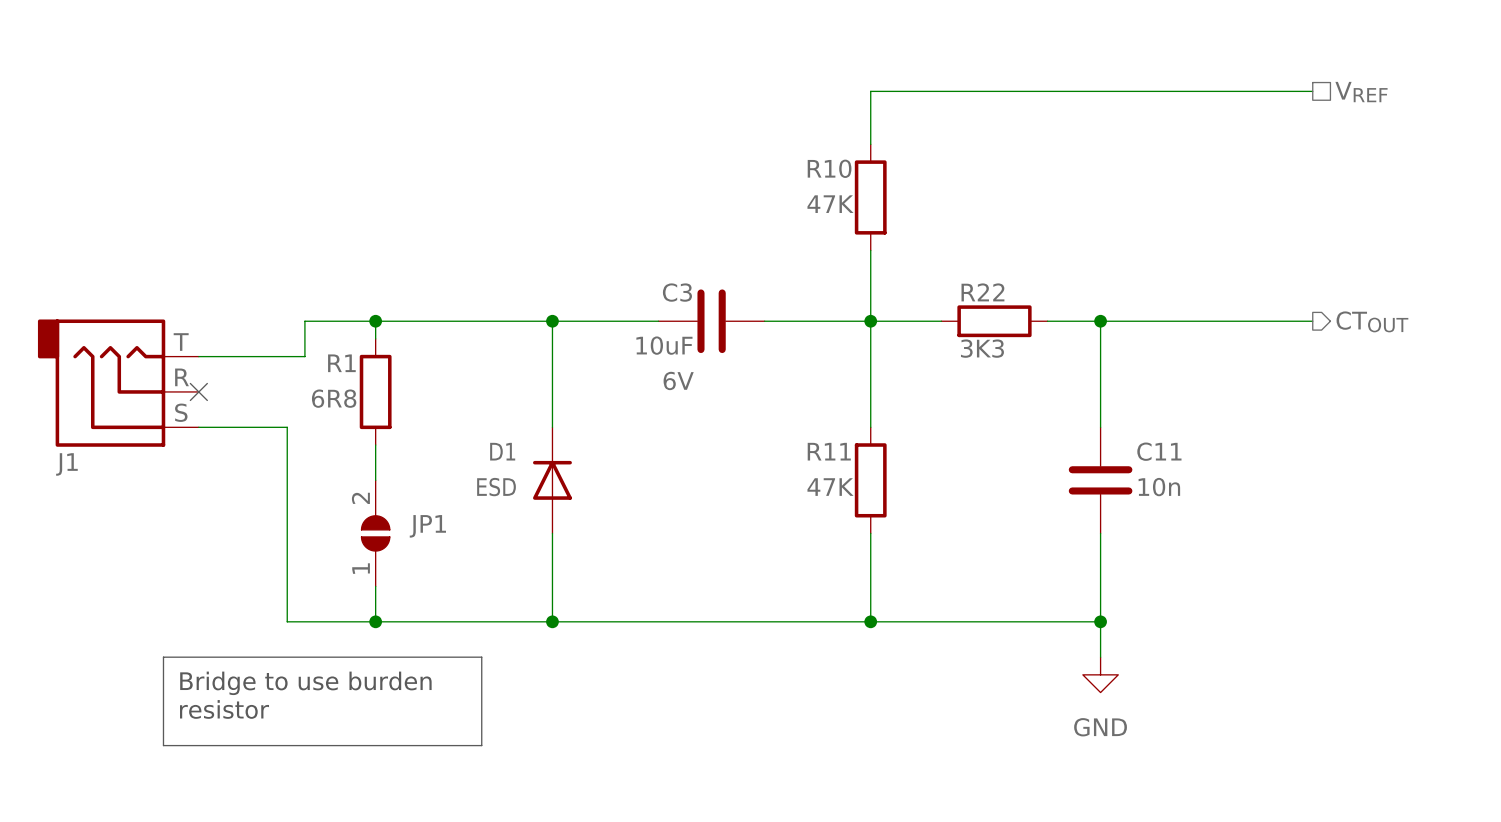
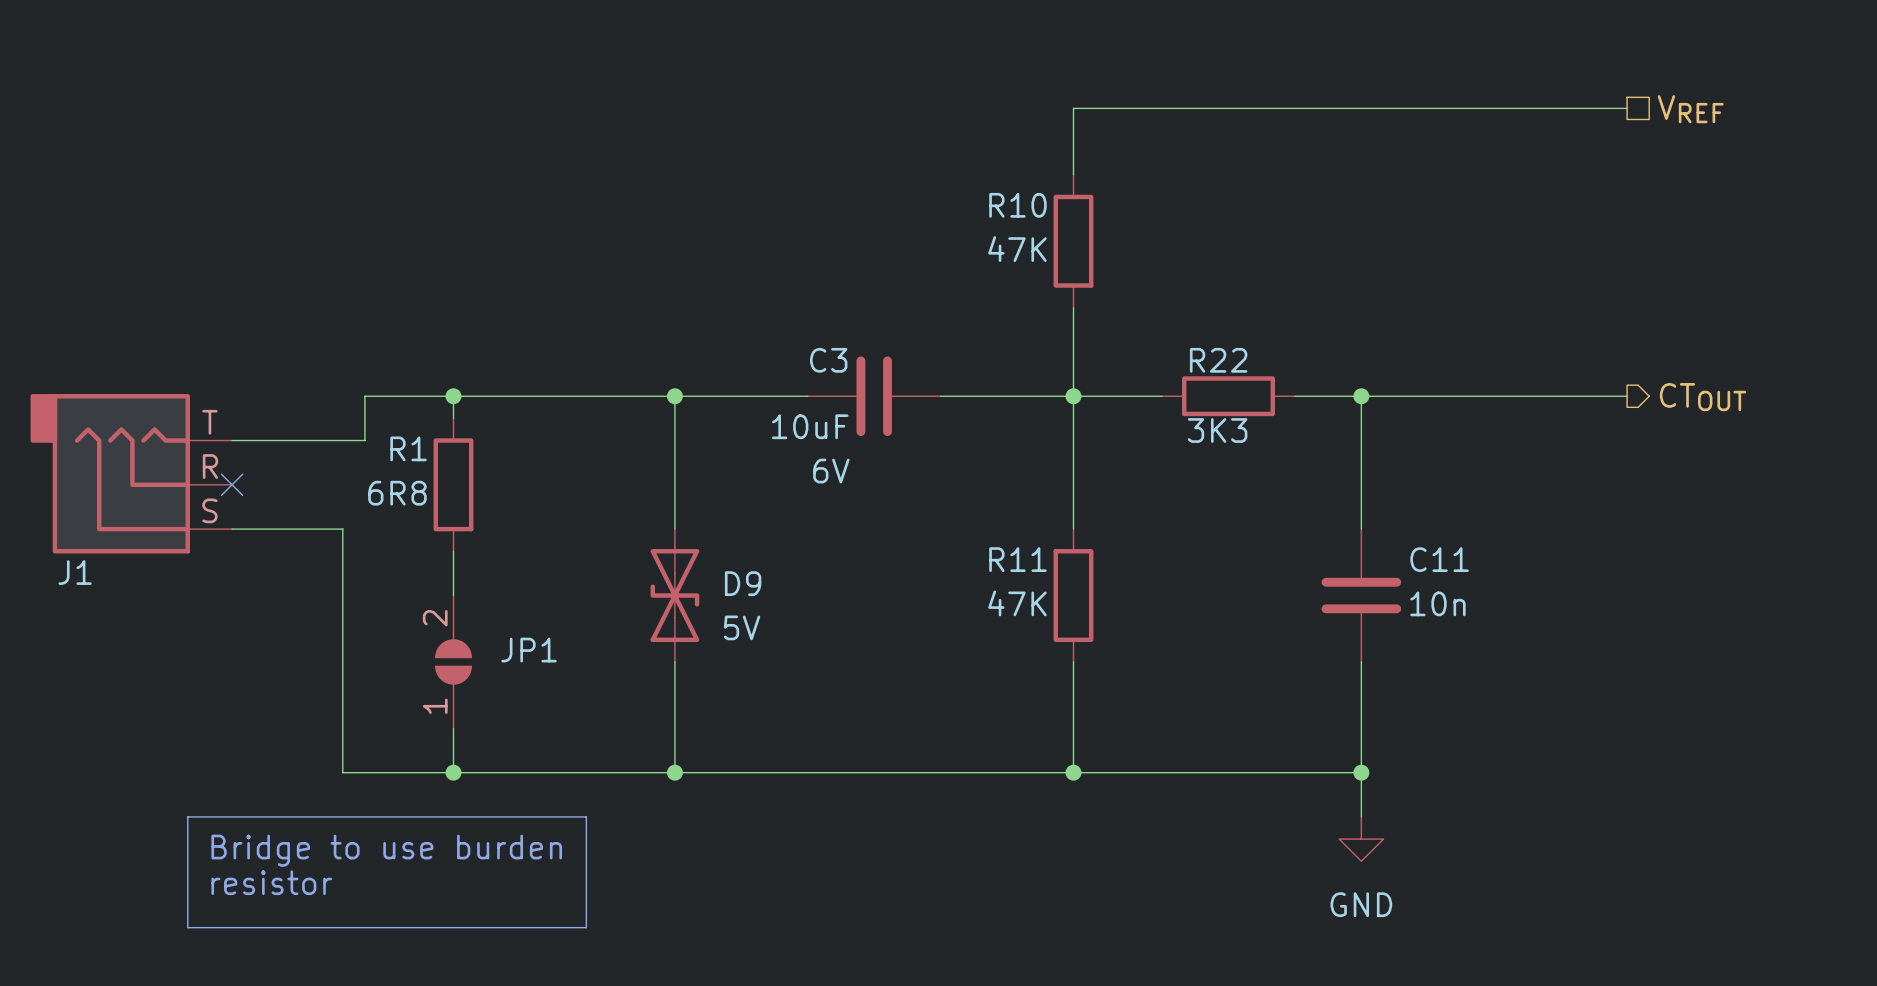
D1: ESD (552, 480) -> none
D9: none -> 5V (674, 595)

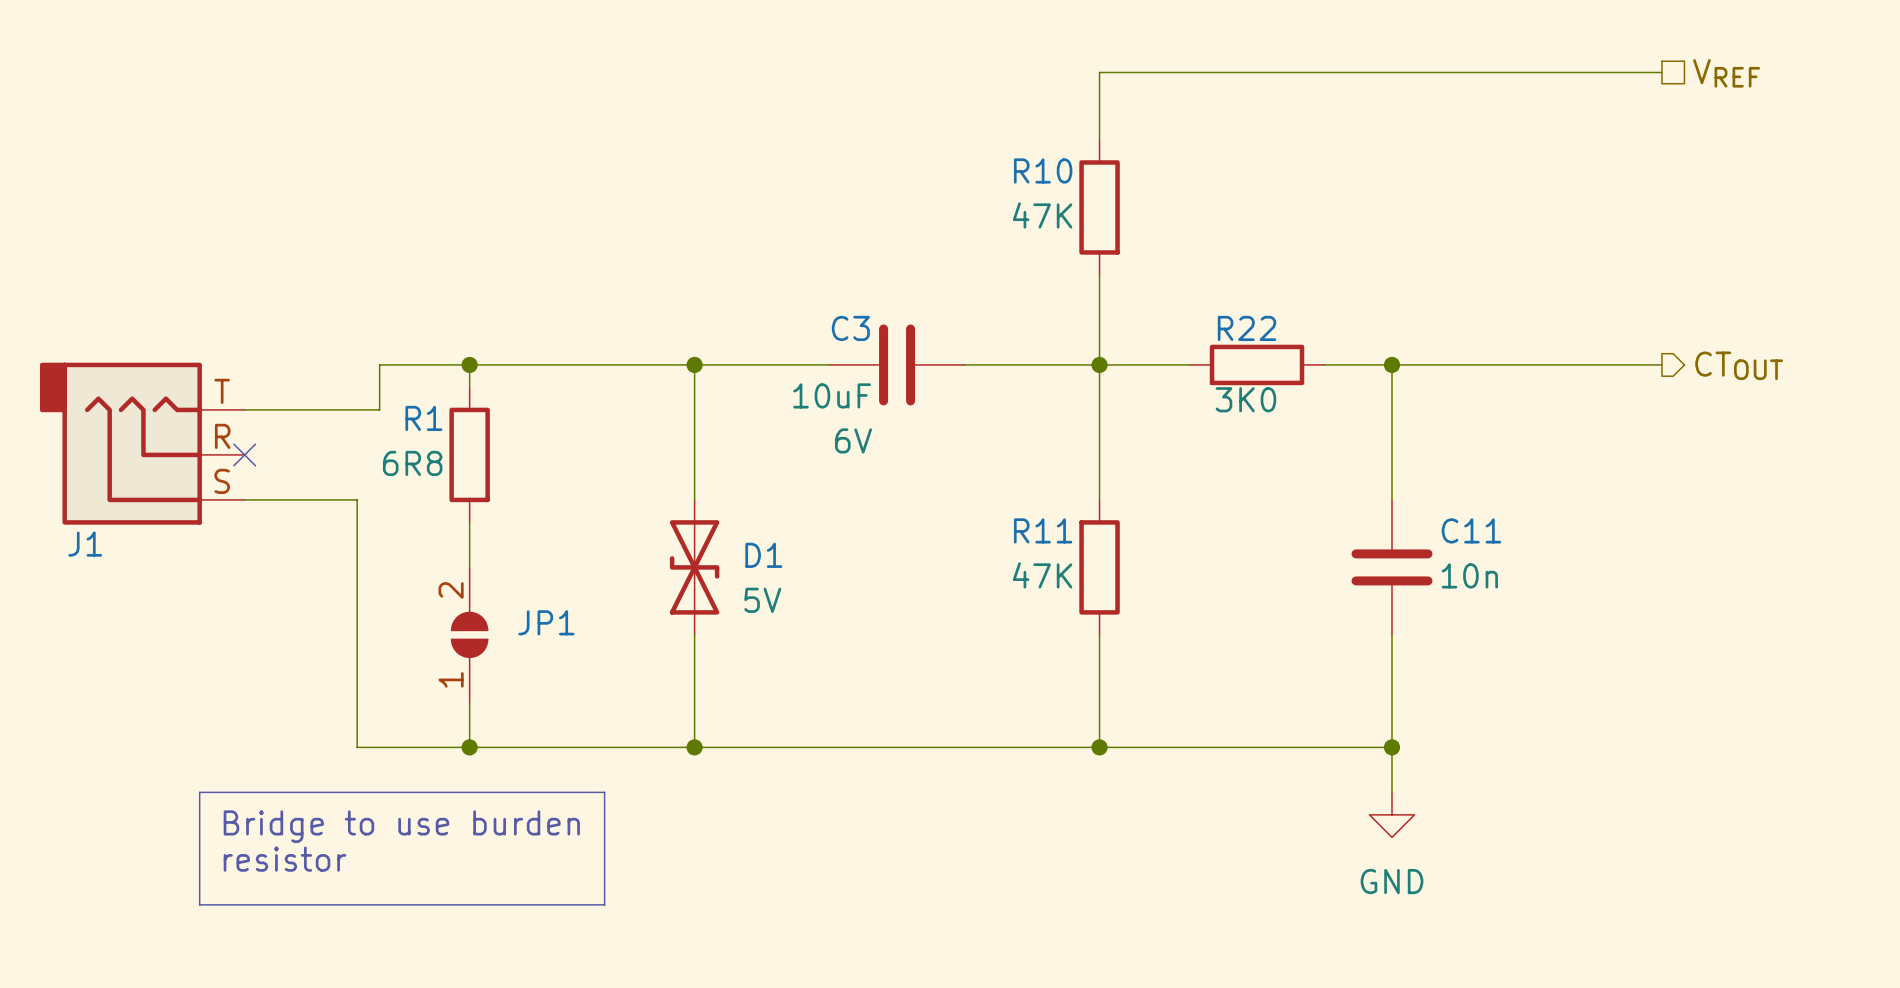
R22 value: 3K3 (1217, 430) -> 3K0 (1245, 399)
D9 name: D9 (743, 583) -> D1 (763, 555)

